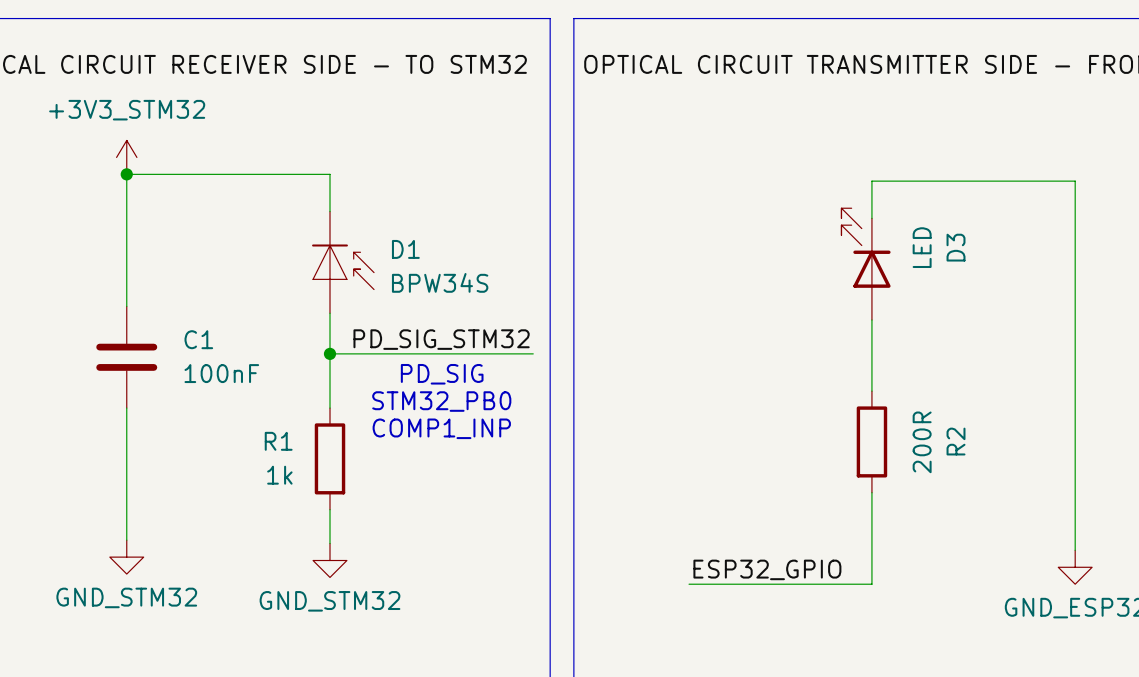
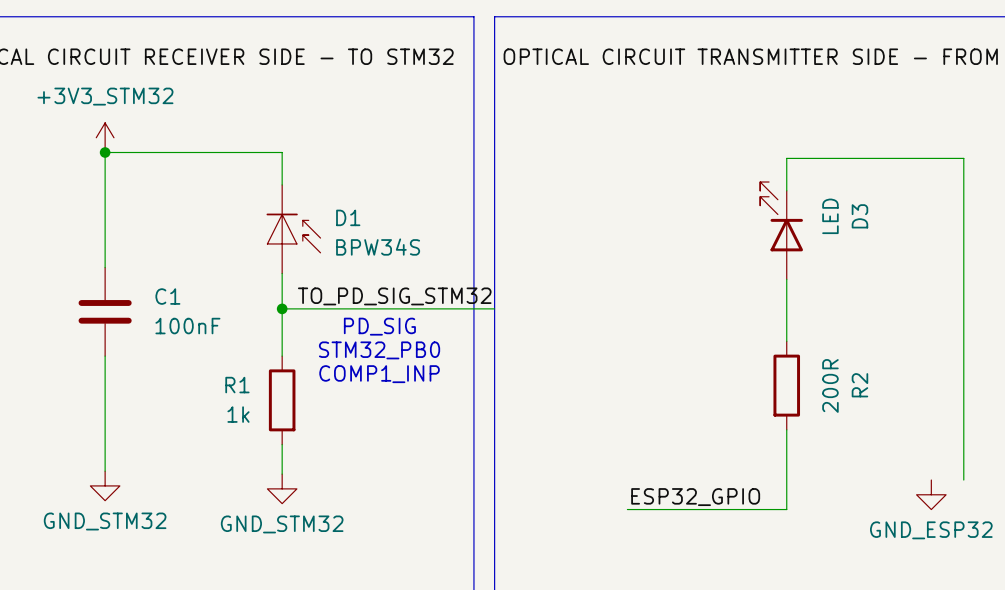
wire: (909, 181) (871, 181) (871, 218) -> (786, 158) (786, 190)
wire: (1075, 181) (1075, 550) -> (931, 158) (963, 158) (963, 480)
D3 position: (866, 264) -> (781, 230)
wire: (871, 320) (871, 391) -> (786, 279) (786, 341)
label: PD_SIG_STM32 (441, 339) -> TO_PD_SIG_STM32 (394, 296)
wire: none -> (459, 308) (494, 308)
R2 position: (871, 441) -> (786, 385)
wire: (871, 492) (871, 584) -> (786, 429) (786, 509) (754, 509)
label position: ESP32_GPIO (767, 569) -> ESP32_GPIO (695, 497)
wire: (689, 584) (726, 584) -> none

